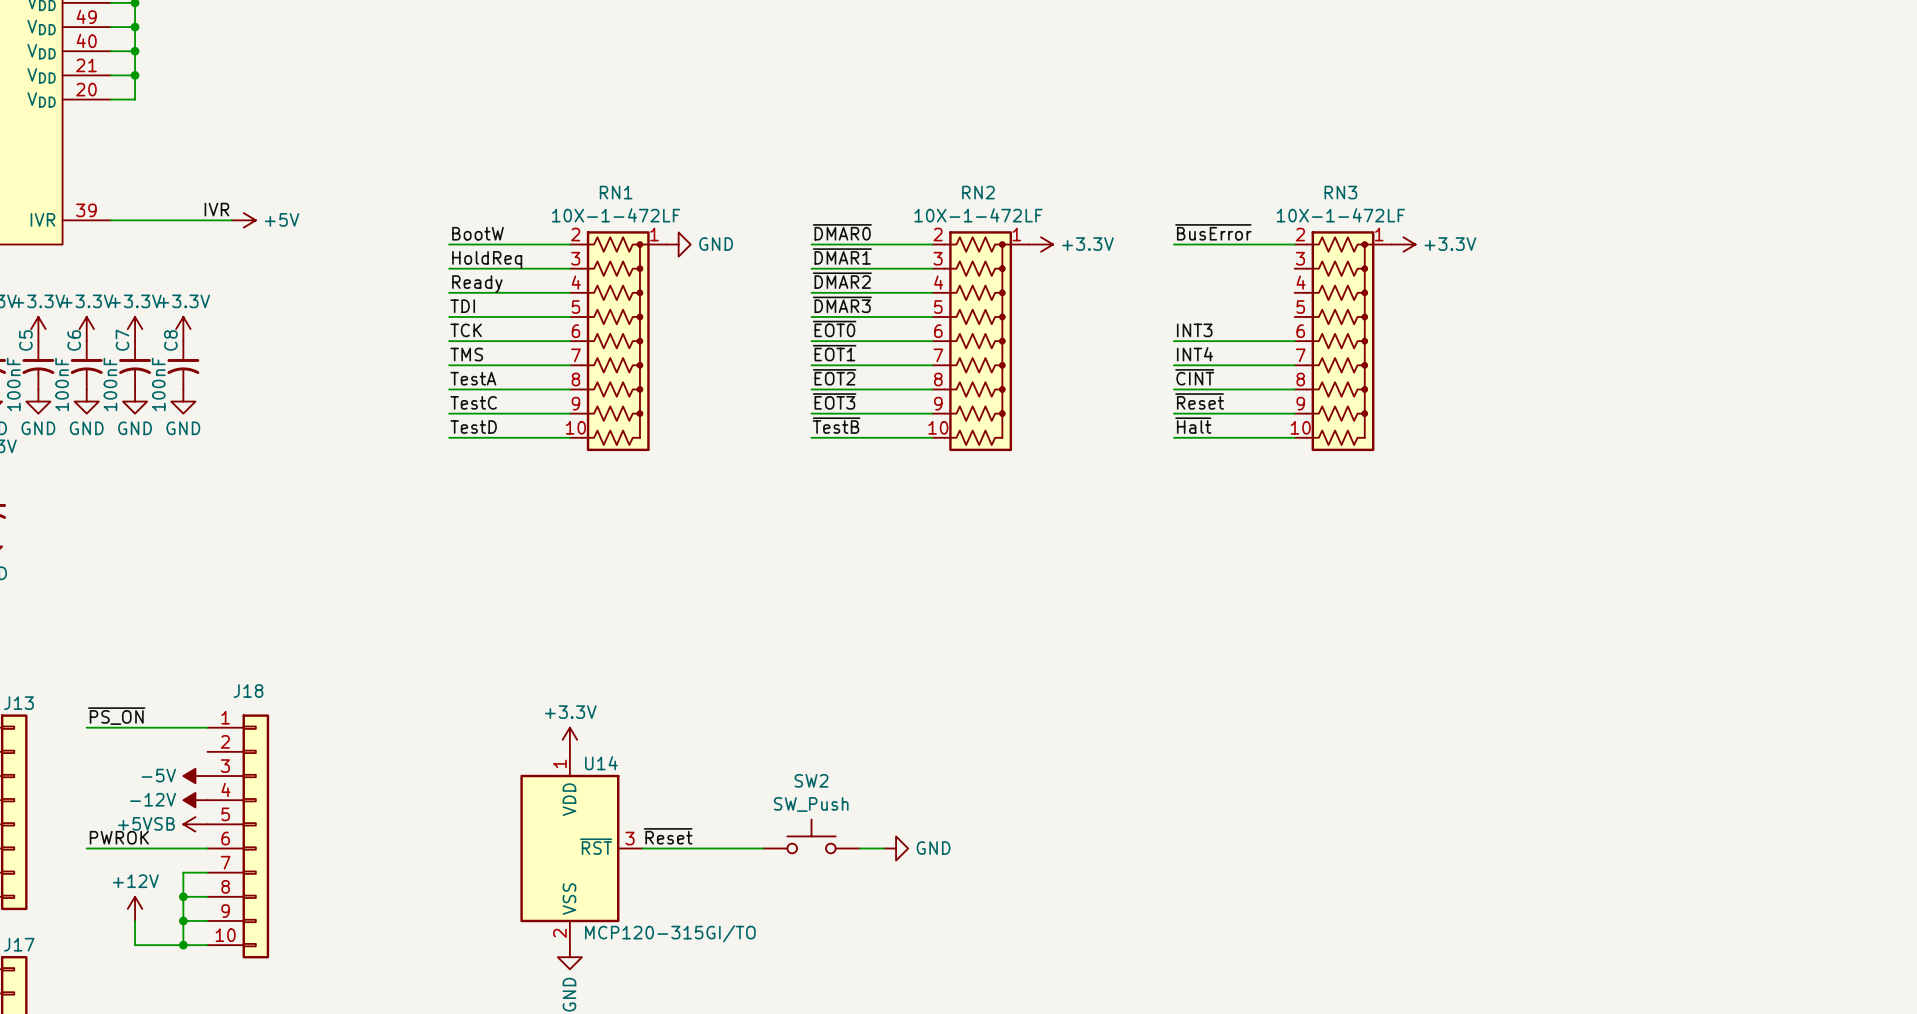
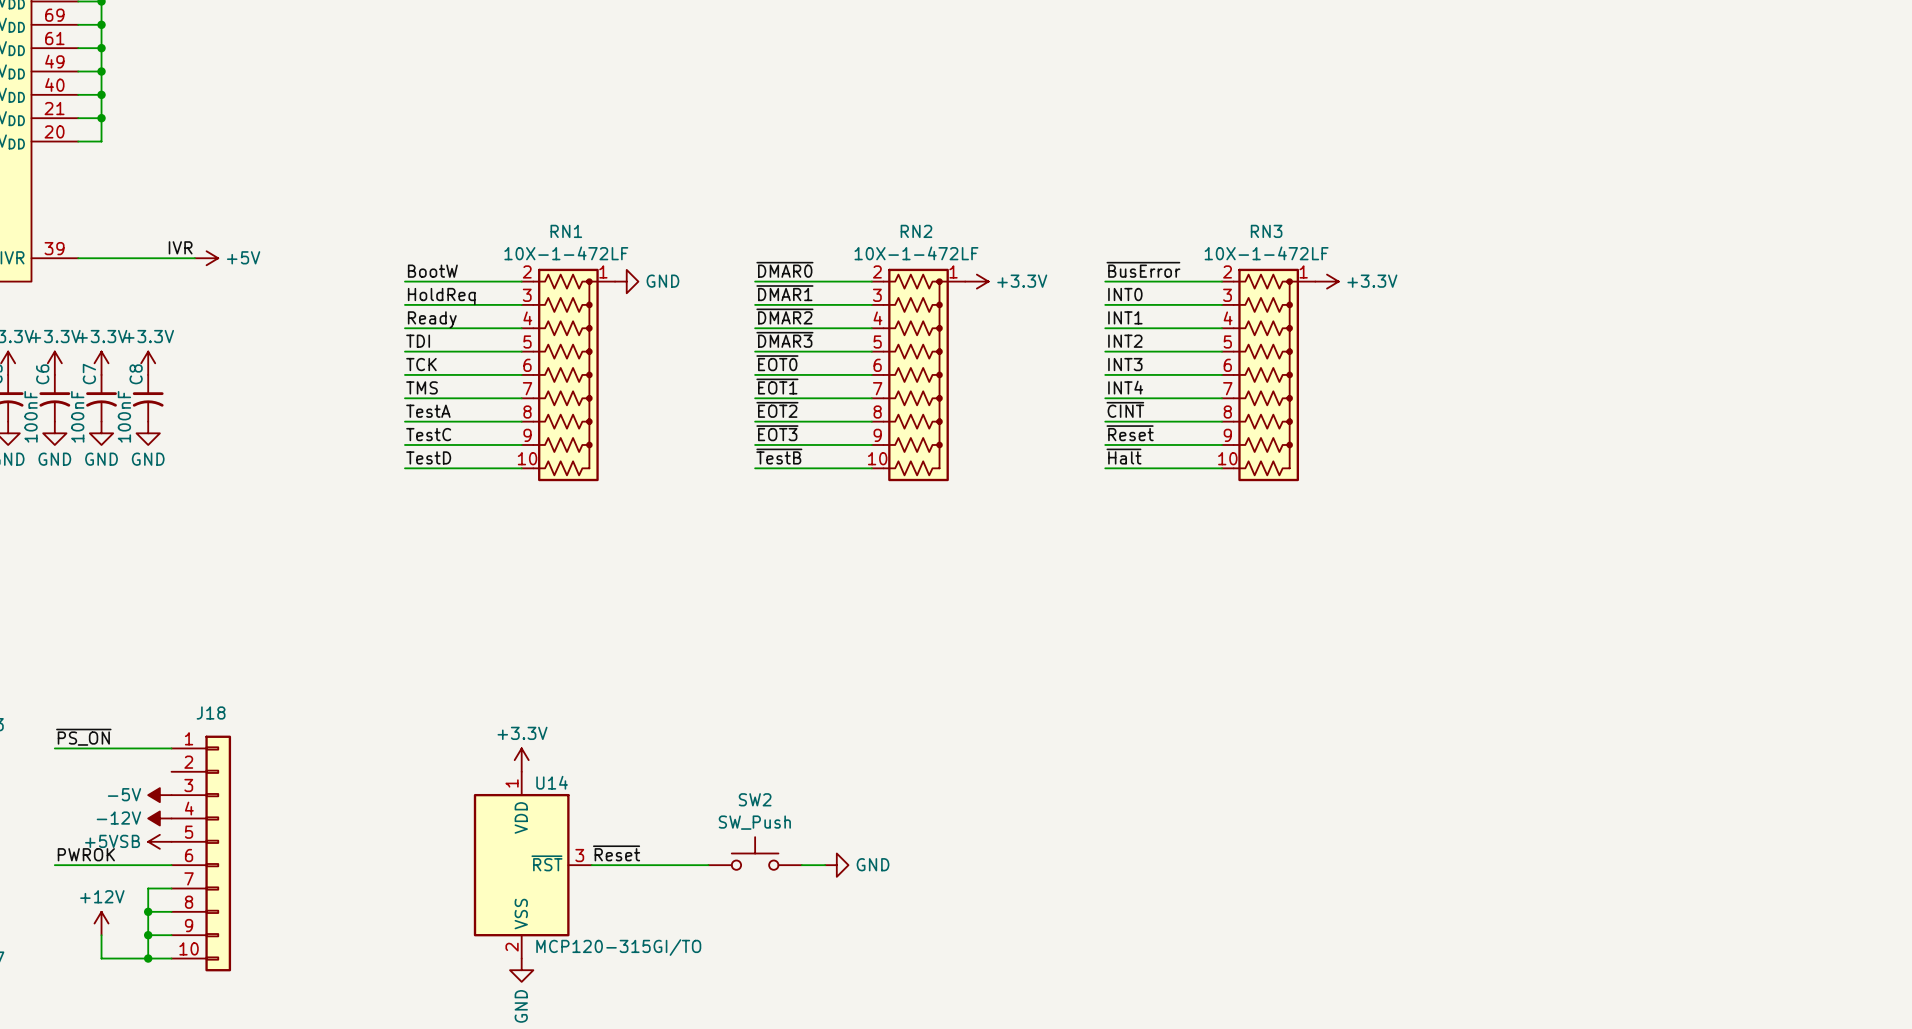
label: none -> INT0 (1125, 294)
wire: none -> (1105, 304) (1221, 304)
label: none -> INT1 (1125, 317)
wire: none -> (1105, 328) (1221, 328)
label: none -> INT2 (1125, 341)
wire: none -> (1105, 351) (1221, 351)

